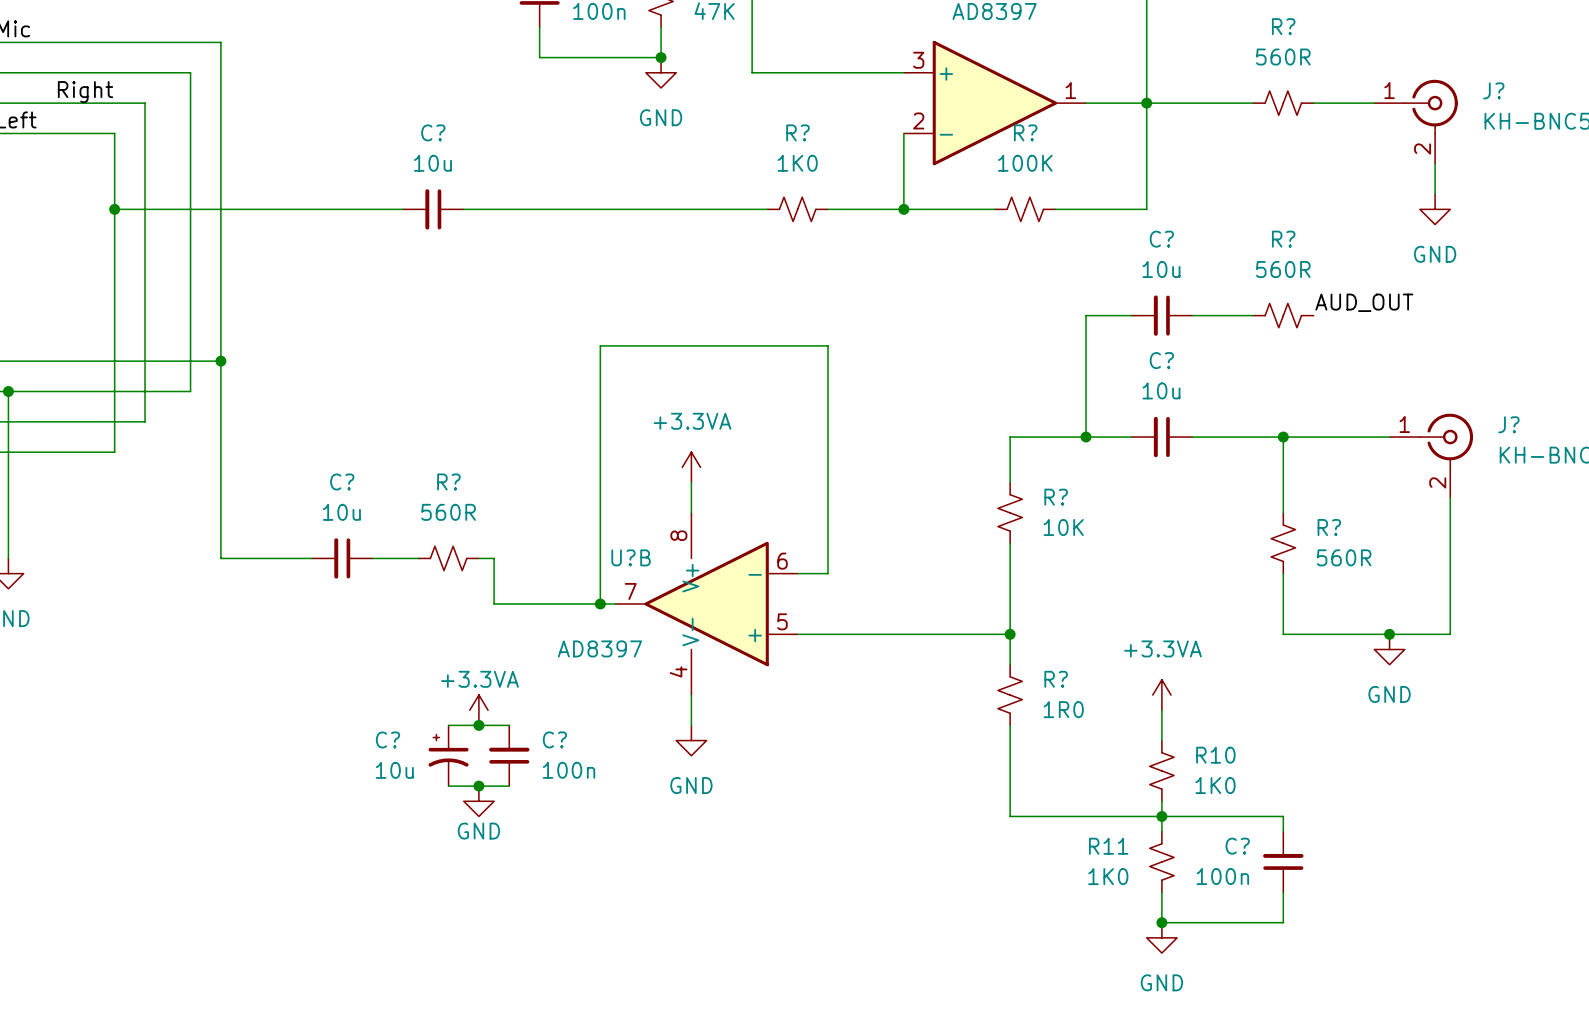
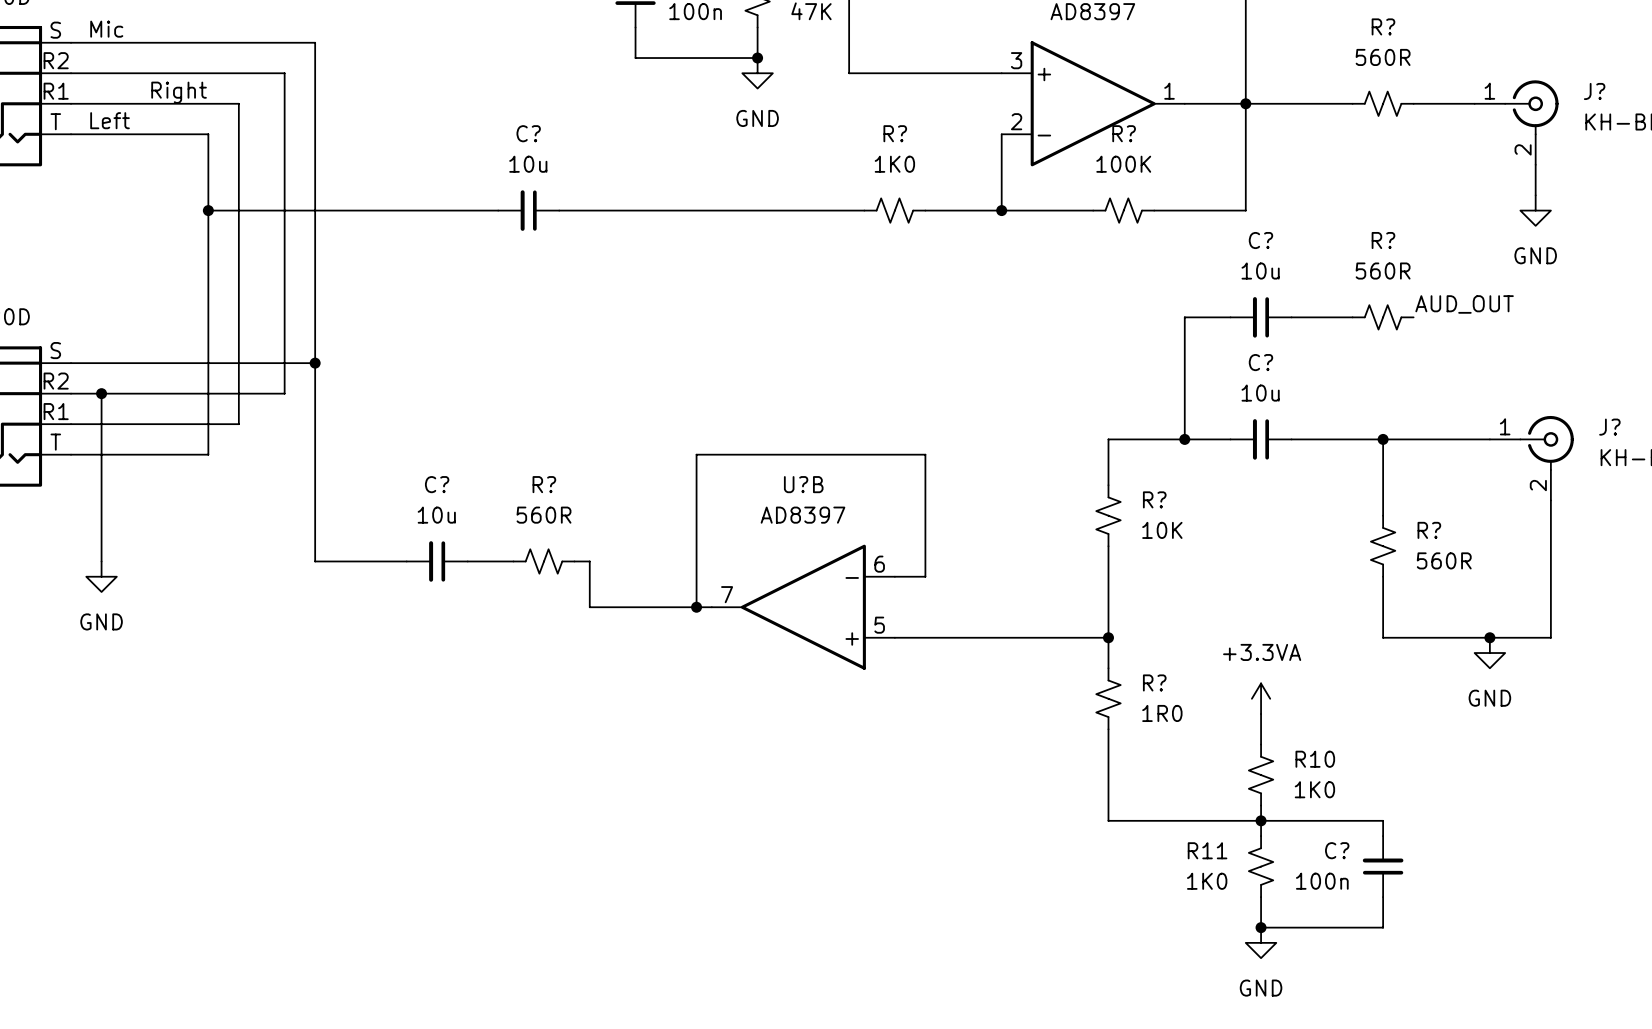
wire: (600, 452) (600, 345) (828, 345) (828, 452) -> (696, 454) (925, 454)
power symbol: +3.3VA (691, 467) -> none
wire: (691, 482) (691, 512) -> none
U?B name position: U?B (631, 557) -> U?B (803, 484)
part: (691, 603) -> none
U?B value position: AD8397 (599, 648) -> AD8397 (802, 515)
wire: (691, 695) (691, 725) -> none
power symbol: +3.3VA (478, 710) -> none
wire: (448, 725) (509, 725) -> none
junction: (478, 725) -> none
power symbol: GND (691, 740) -> none
C?: 10u (448, 755) -> none
C?: 100n (509, 755) -> none
wire: (448, 786) (509, 786) -> none
junction: (478, 786) -> none
power symbol: GND (478, 801) -> none

